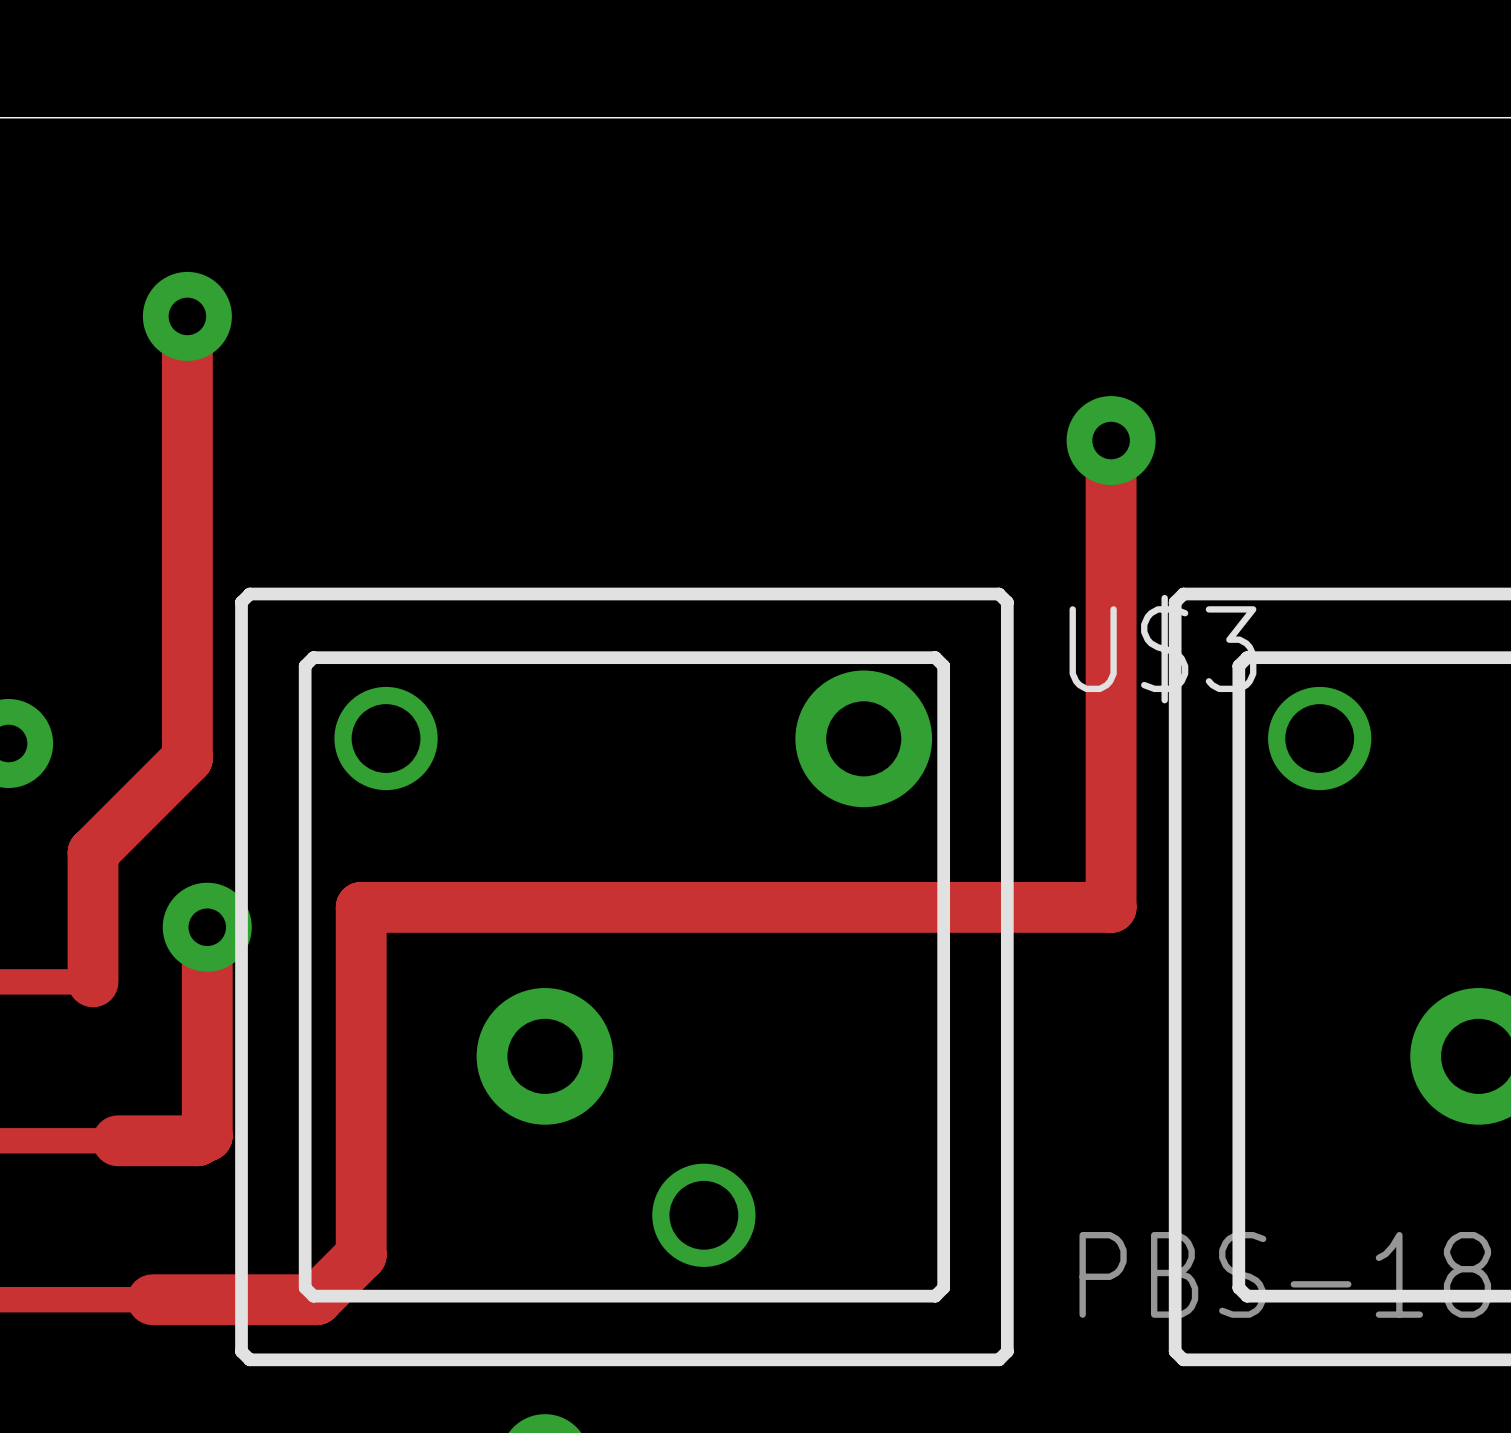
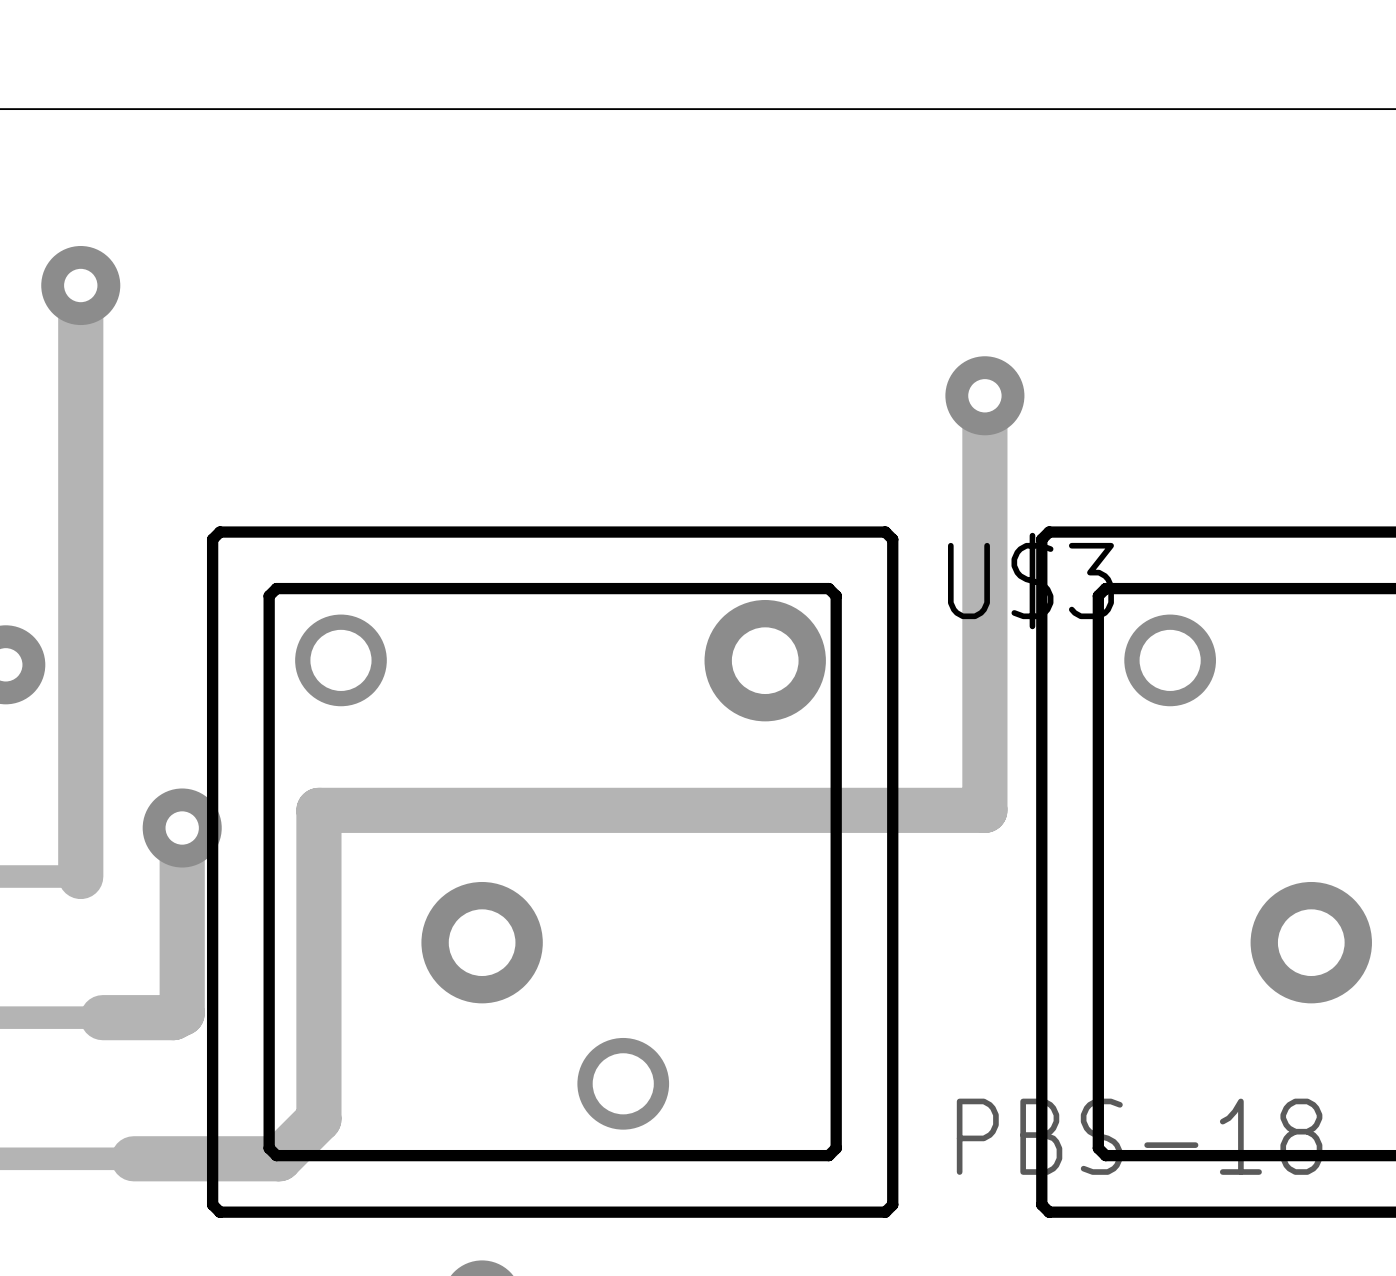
track: (187, 316) (187, 758) (93, 852) -> (80, 285) (80, 761)
via position: (187, 316) -> (80, 285)

